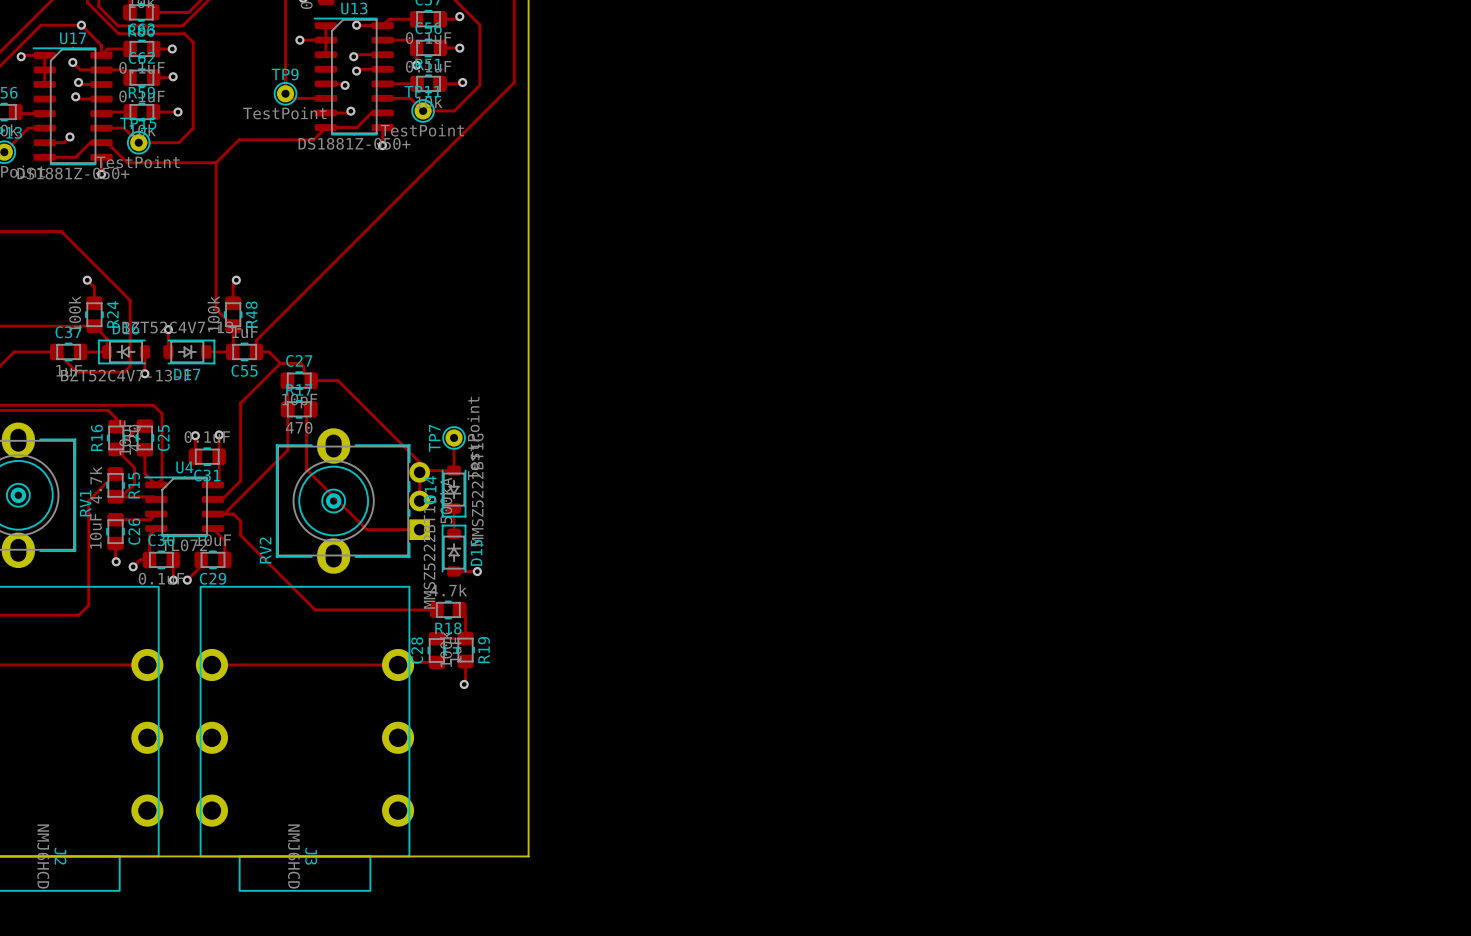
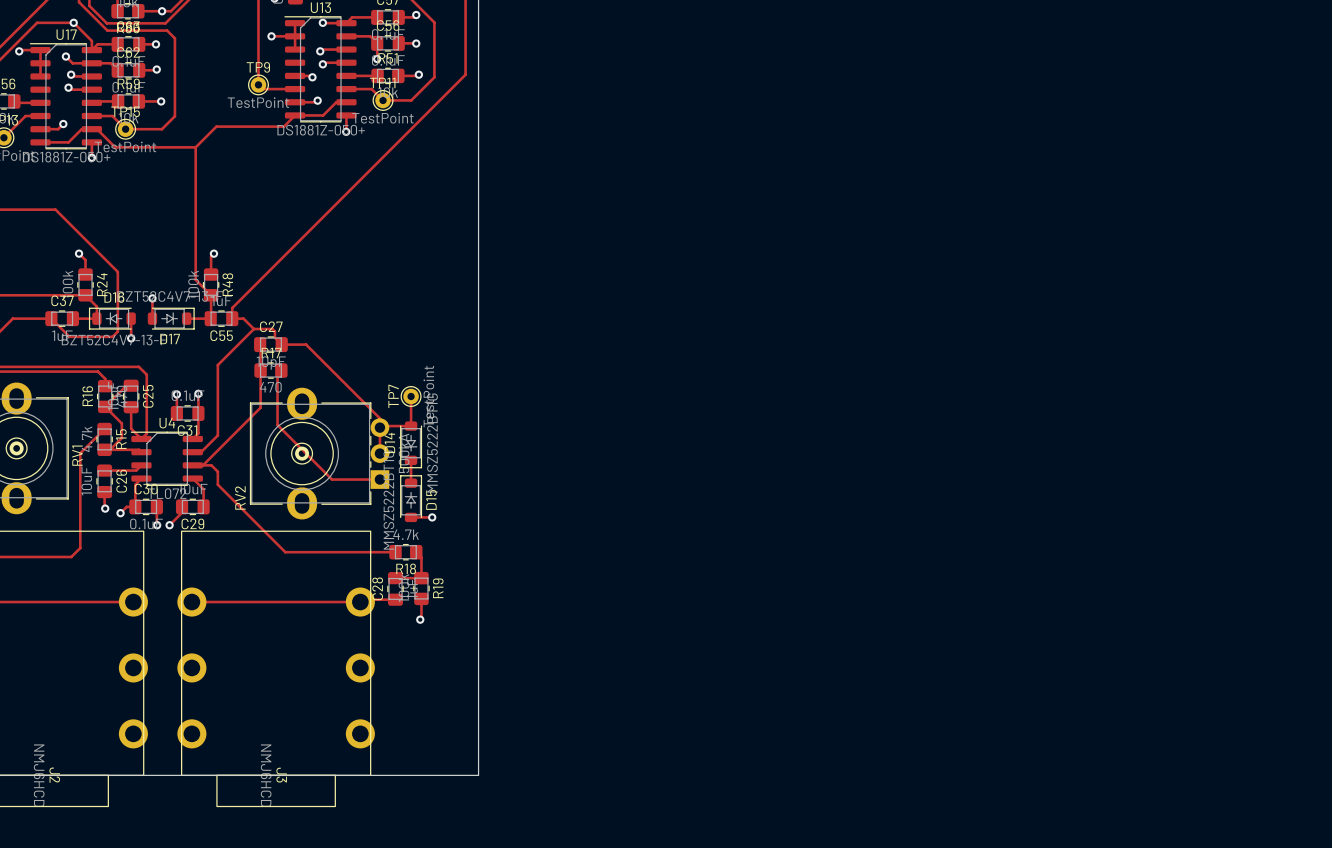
via: none -> (162, 11)

